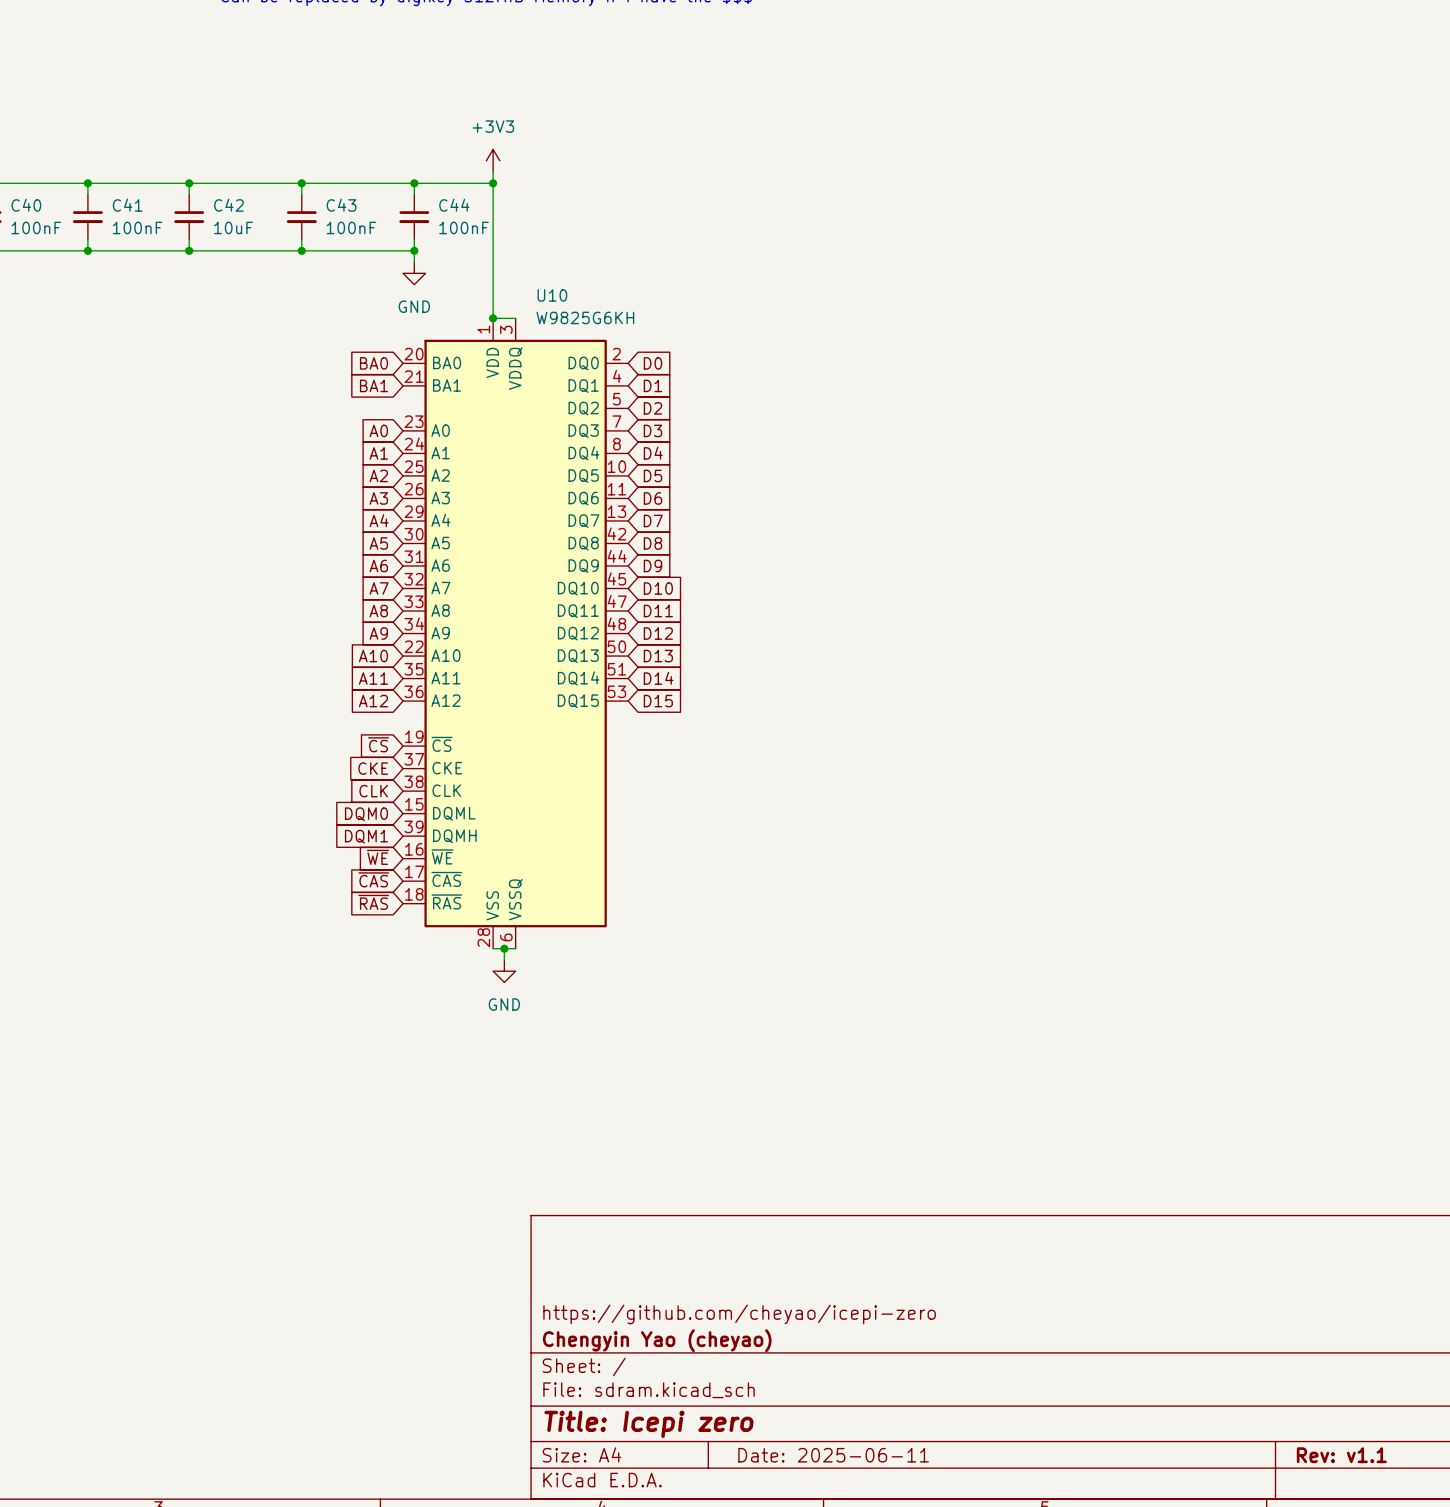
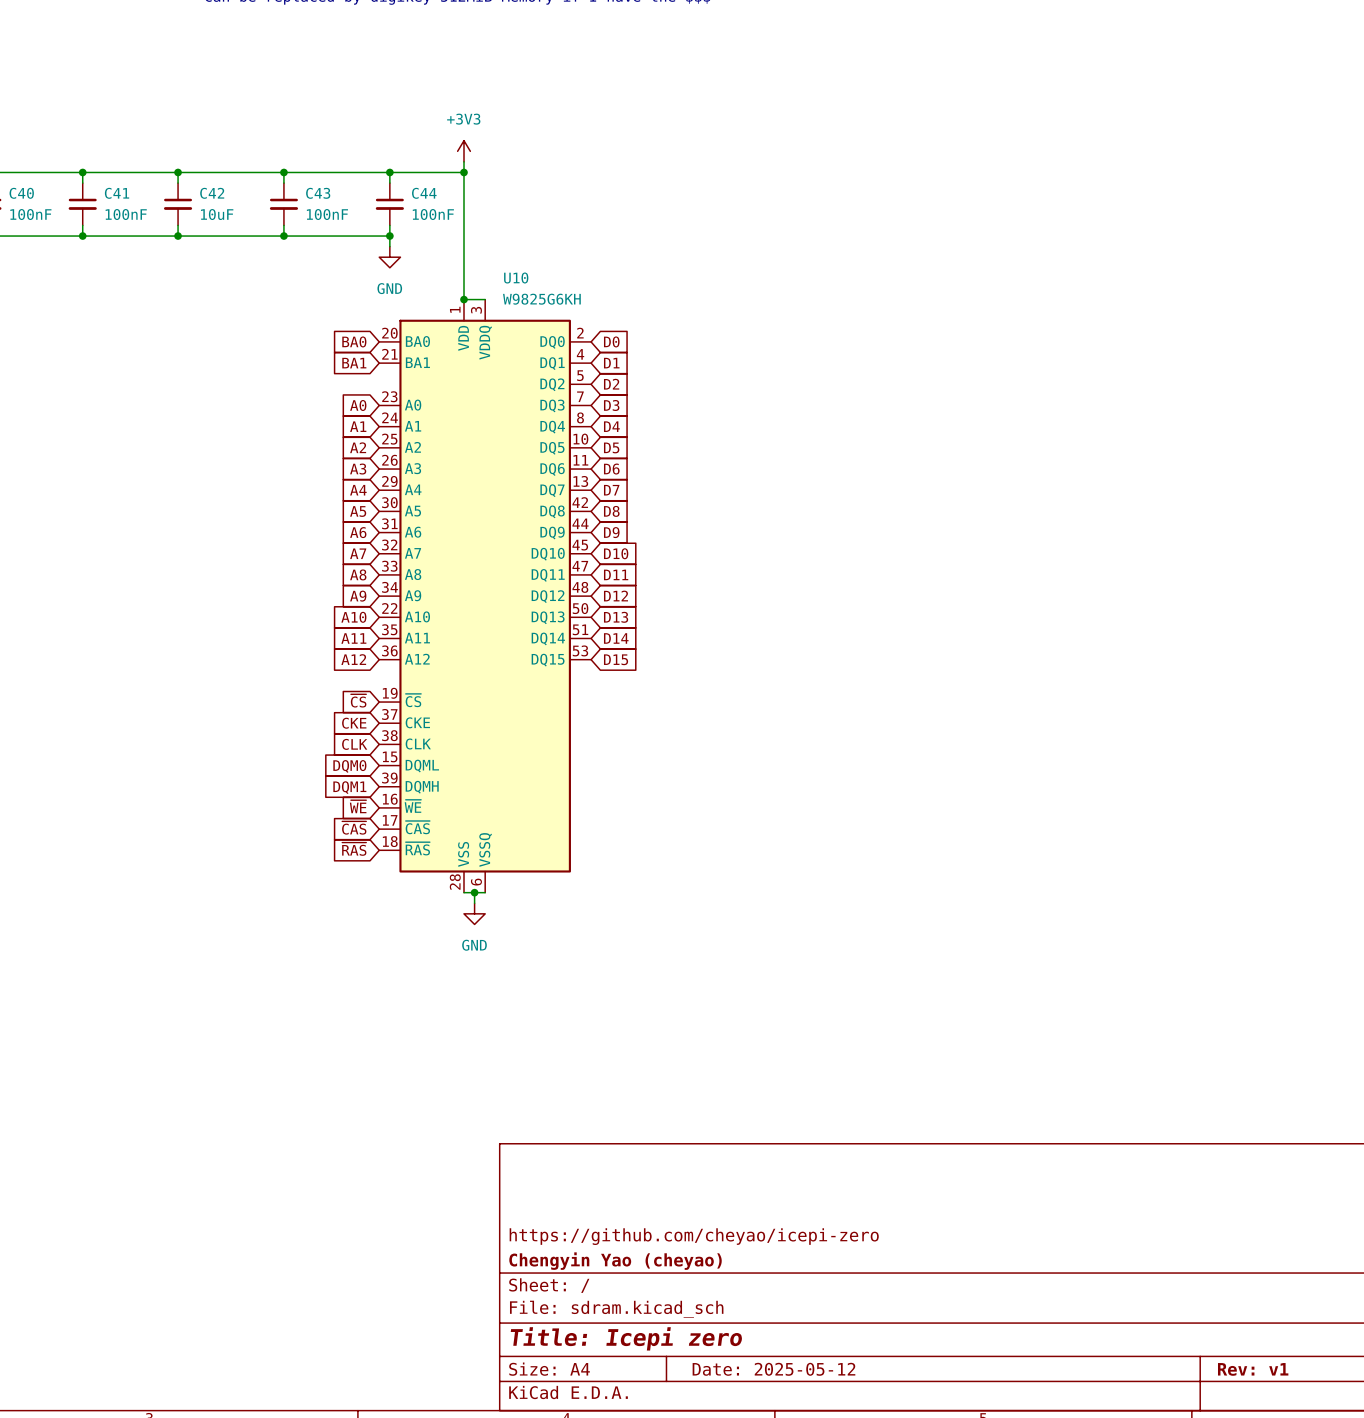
title block: Date: 2025-06-11 (833, 1455) -> Date: 2025-05-12 (773, 1369)
title block: Rev: v1.1 (1341, 1455) -> Rev: v1 (1253, 1369)

